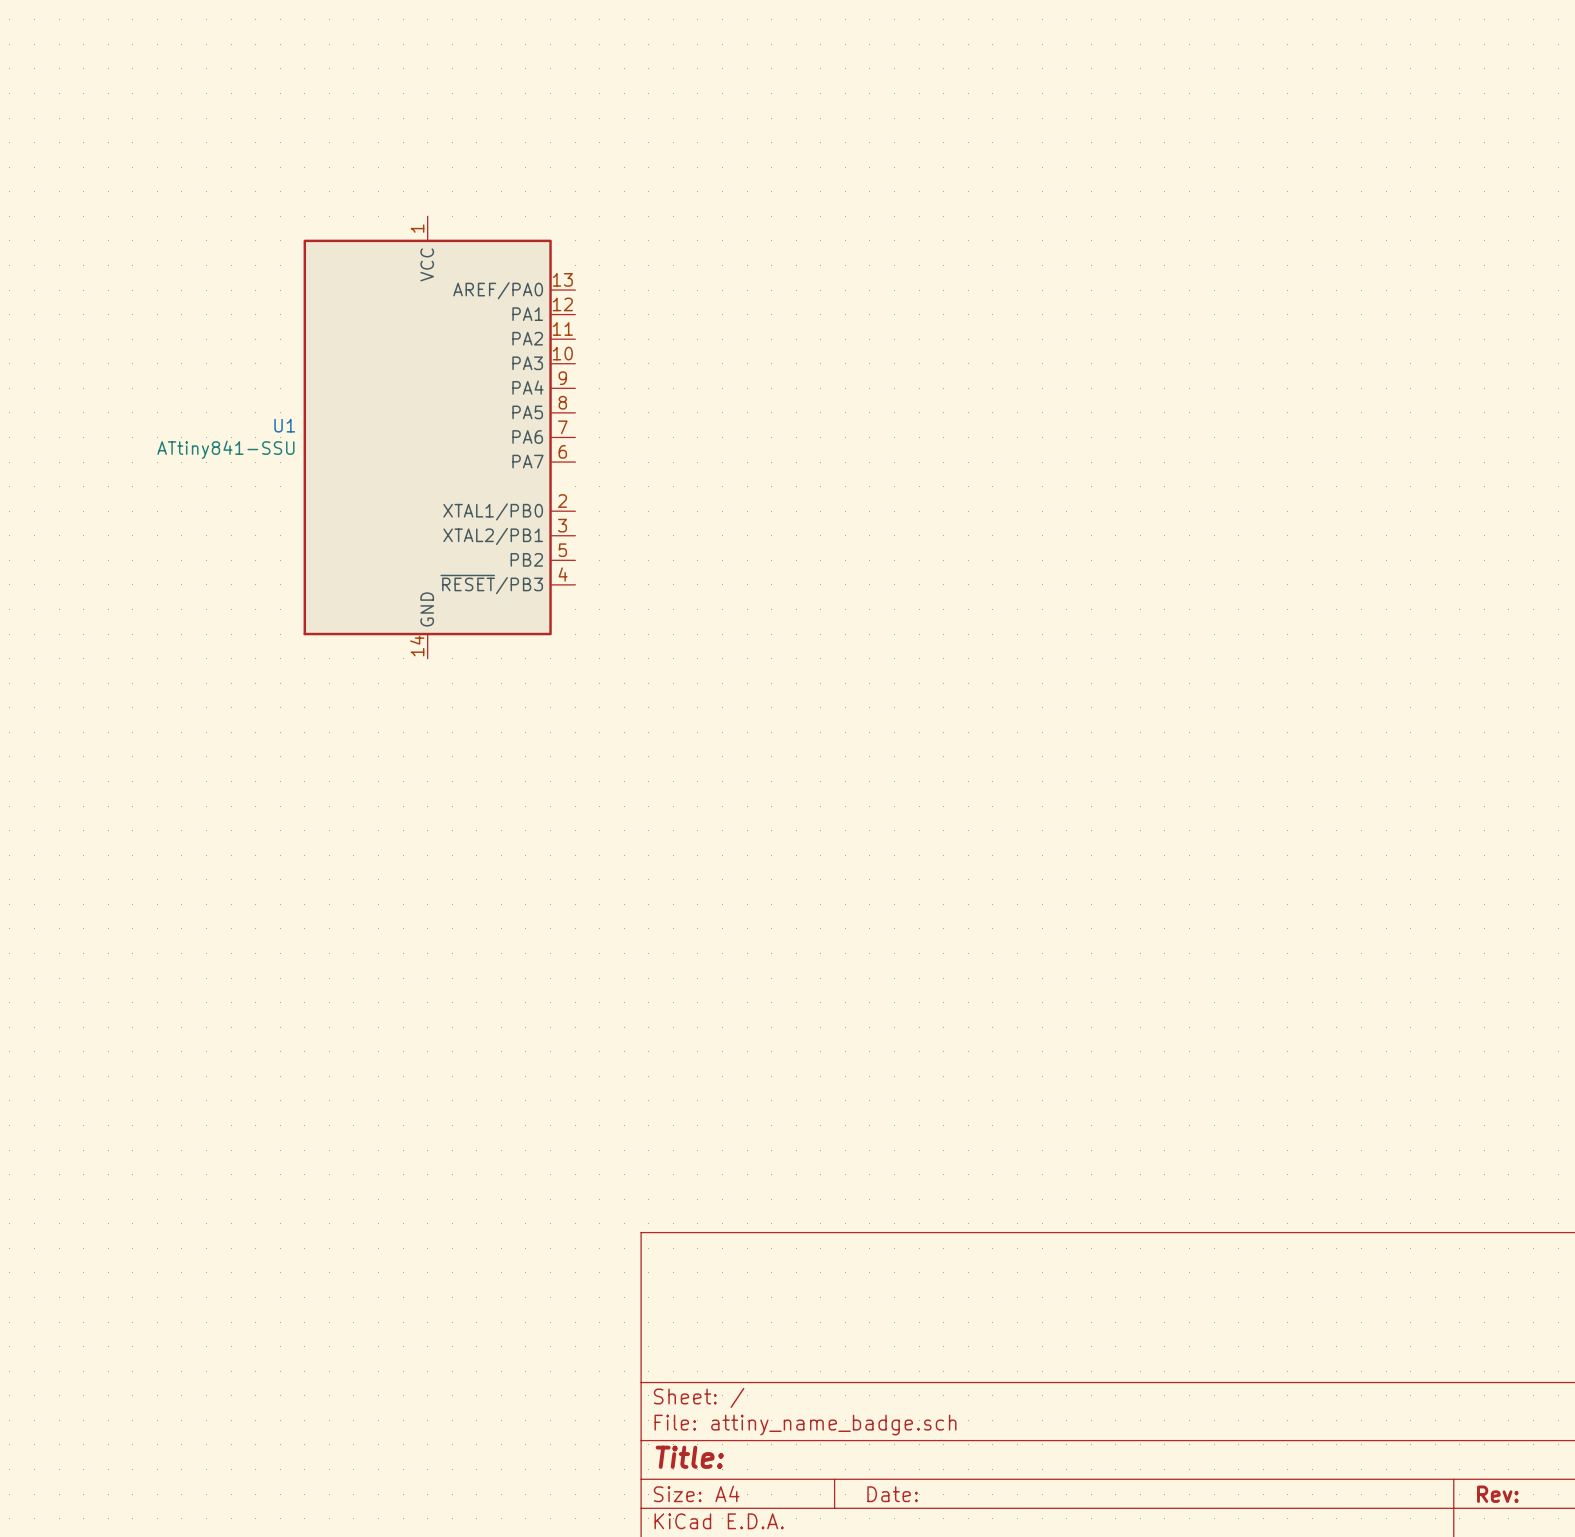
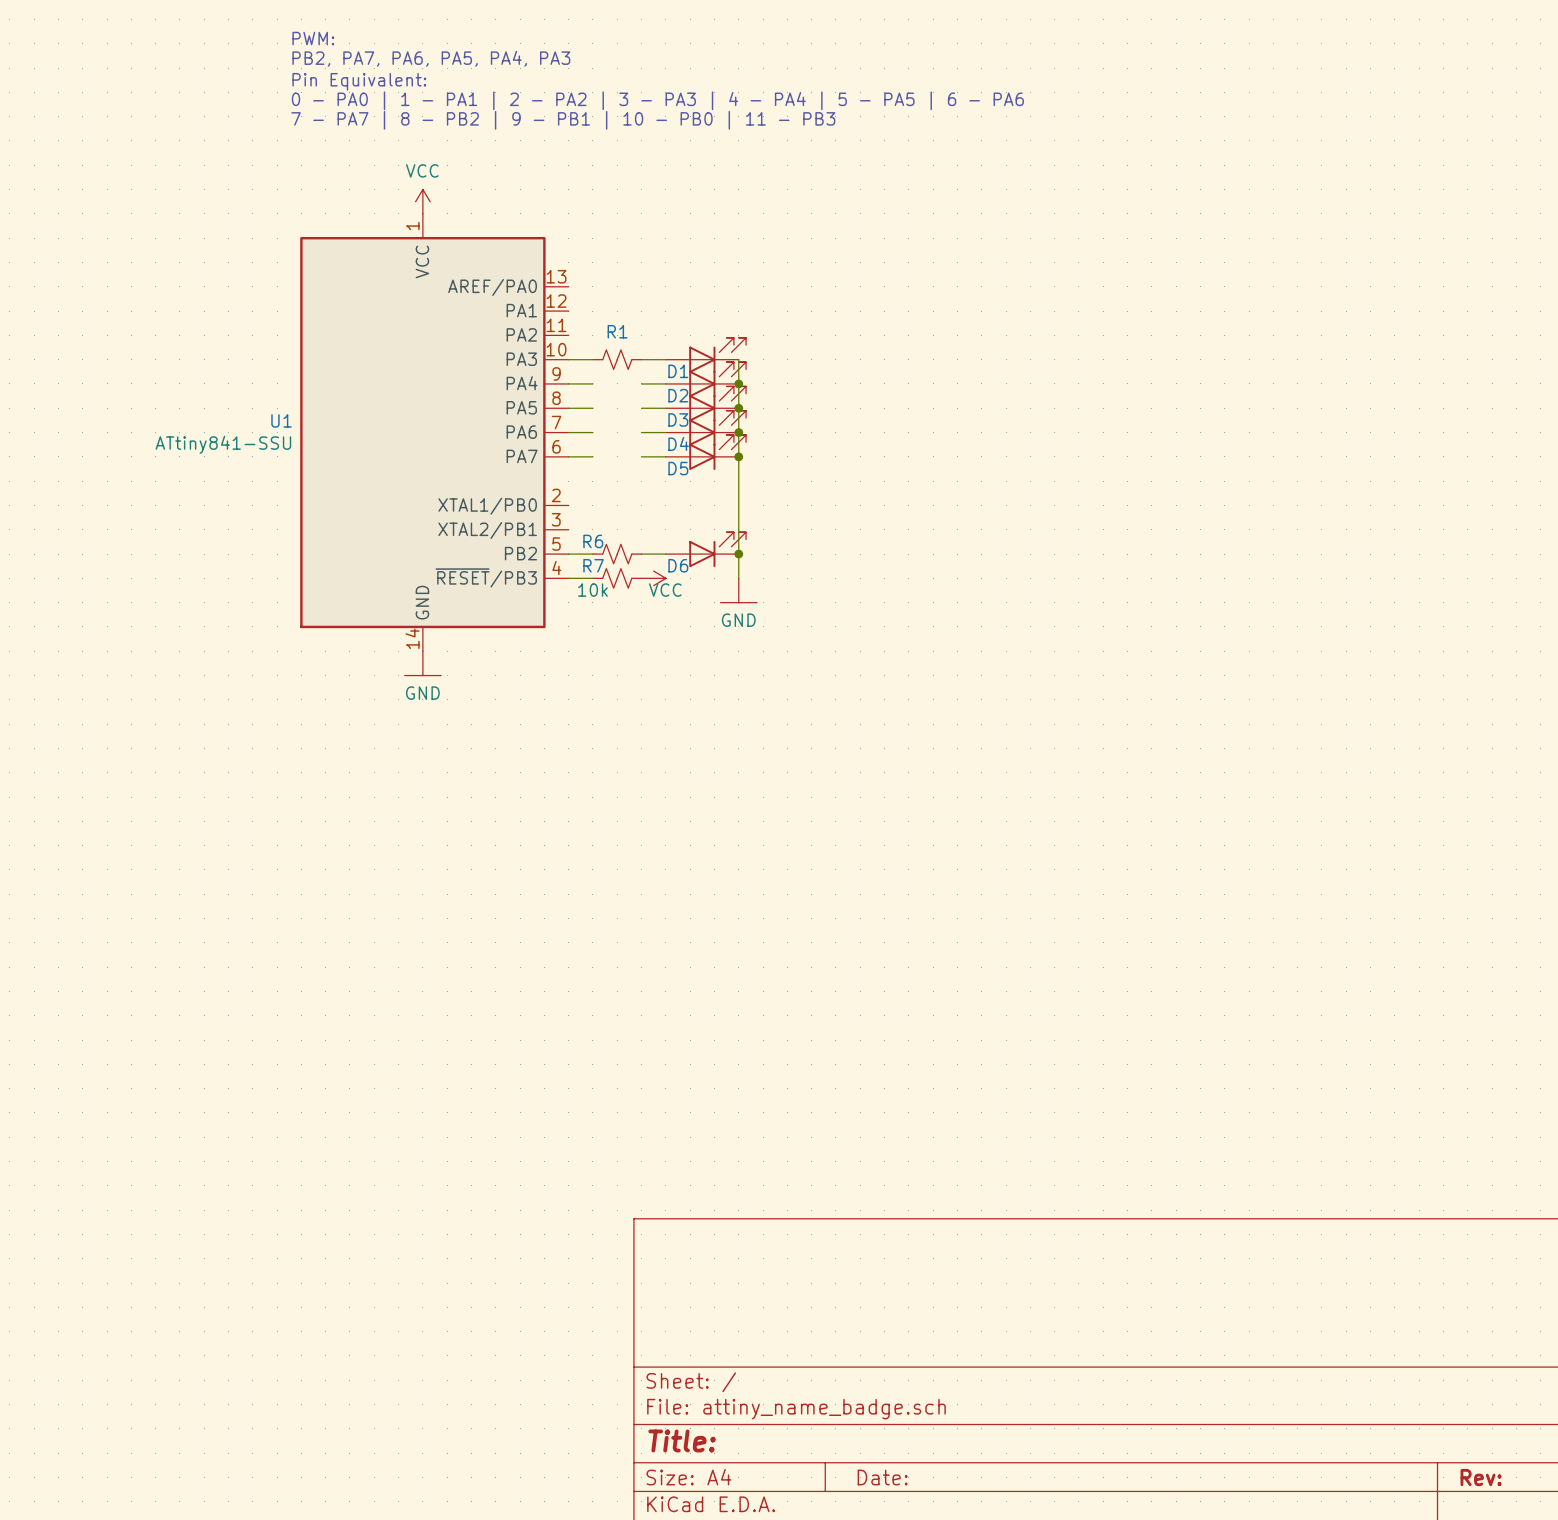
text: none -> PWM: (313, 38)
text: none -> PB2, PA7, PA6, PA5, PA4, PA3 (431, 58)
text: none -> Pin Equivalent: (359, 81)
text: none -> 0 - PA0 | 1 - PA1 | 2 - PA2 | 3 - PA3 | 4 - PA4 | 5 - PA5 | 6 - PA6 (657, 100)
text: none -> 7 - PA7 | 8 - PB2 | 9 - PB1 | 10 - PB0 | 11 - PB3 (563, 120)
power symbol: none -> VCC (422, 201)
D1: none -> (705, 355)
wire: none -> (568, 359) (592, 359)
R1: none -> (617, 359)
wire: none -> (641, 359) (665, 359)
wire: none -> (738, 359) (738, 578)
D2: none -> (705, 379)
wire: none -> (568, 383) (592, 383)
wire: none -> (641, 383) (665, 383)
junction: none -> (738, 383)
D3: none -> (705, 403)
wire: none -> (568, 408) (592, 408)
wire: none -> (641, 408) (665, 408)
junction: none -> (738, 408)
D4: none -> (705, 428)
wire: none -> (568, 432) (592, 432)
wire: none -> (641, 432) (665, 432)
junction: none -> (738, 432)
D5: none -> (705, 452)
wire: none -> (568, 456) (592, 456)
wire: none -> (641, 456) (665, 456)
junction: none -> (738, 456)
D6: none -> (705, 549)
wire: none -> (568, 554) (592, 554)
R6: none -> (617, 554)
wire: none -> (641, 554) (665, 554)
junction: none -> (738, 554)
wire: none -> (568, 578) (592, 578)
R7: none -> 10k (617, 578)
power symbol: none -> VCC (653, 578)
power symbol: none -> GND (738, 590)
power symbol: none -> GND (422, 663)

